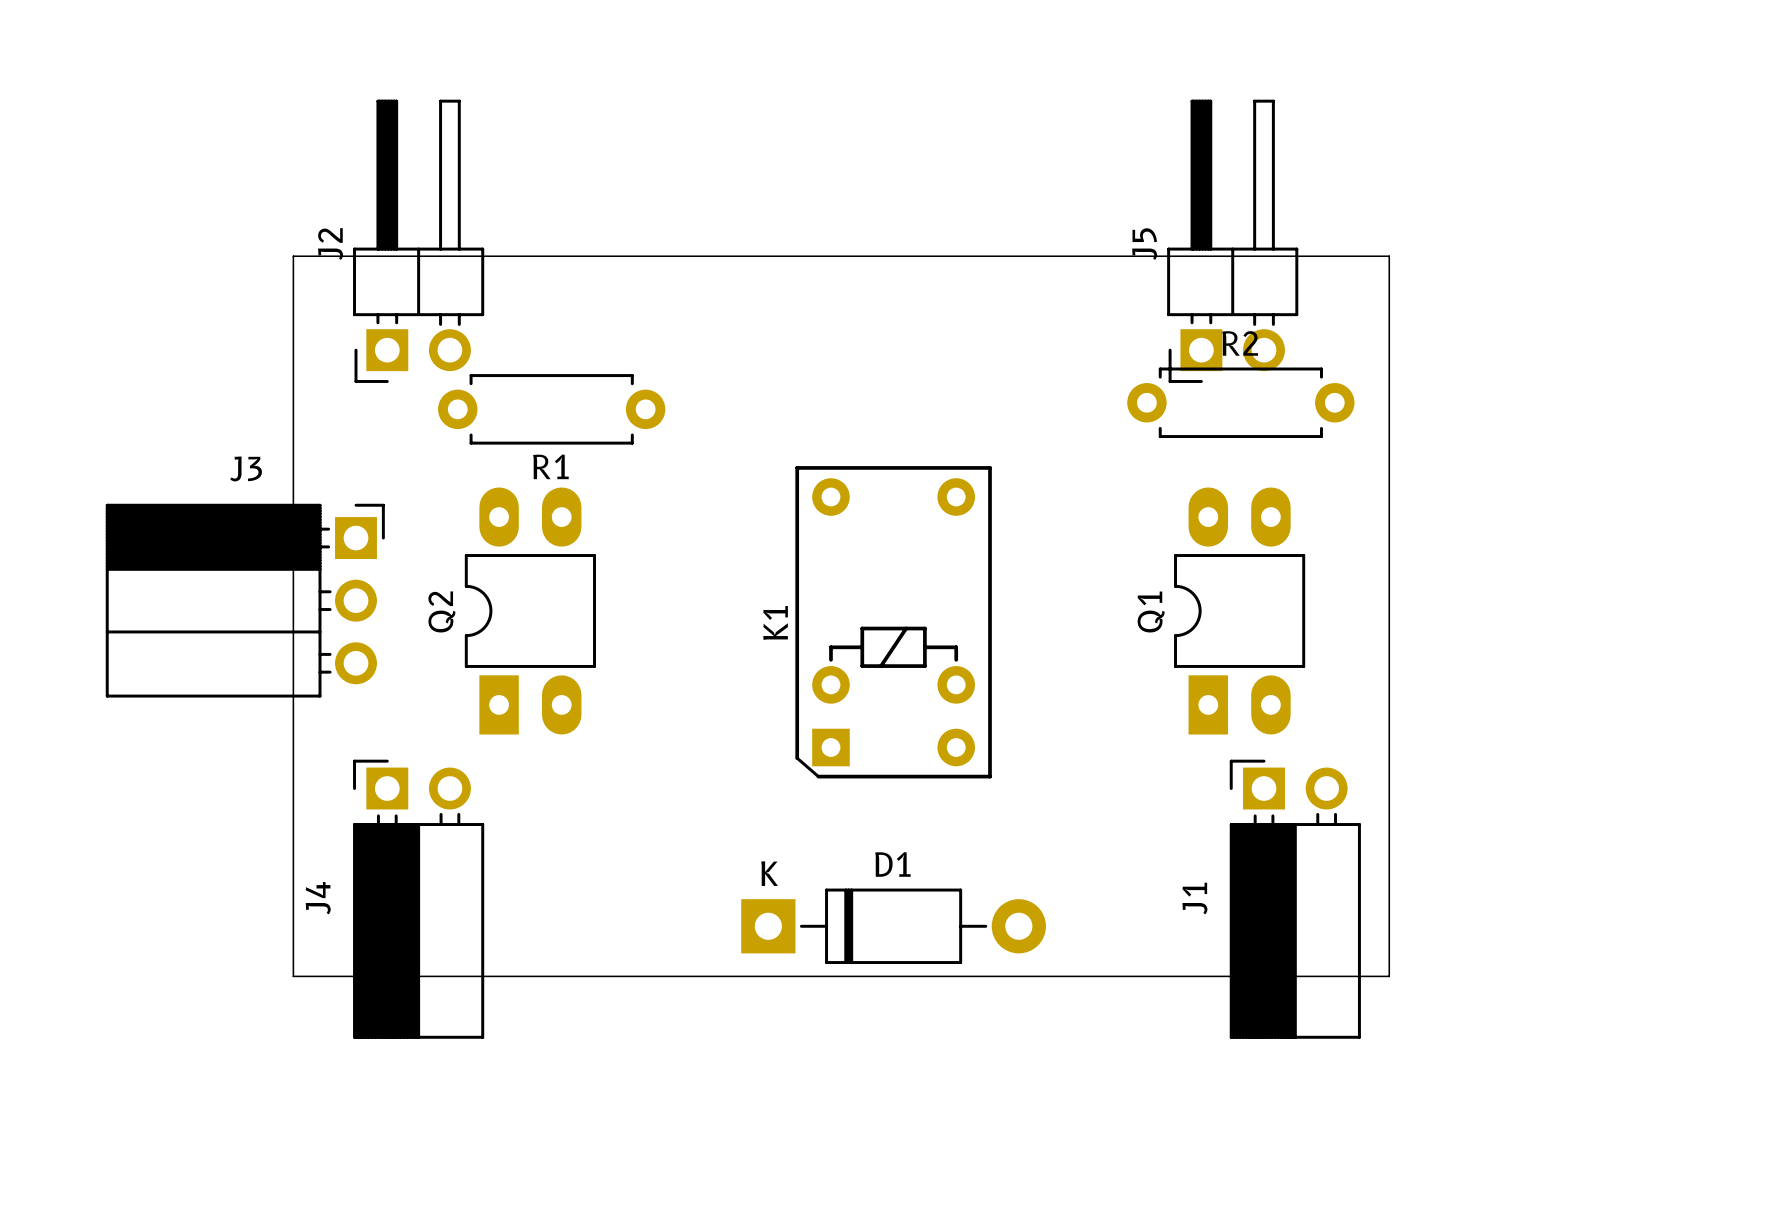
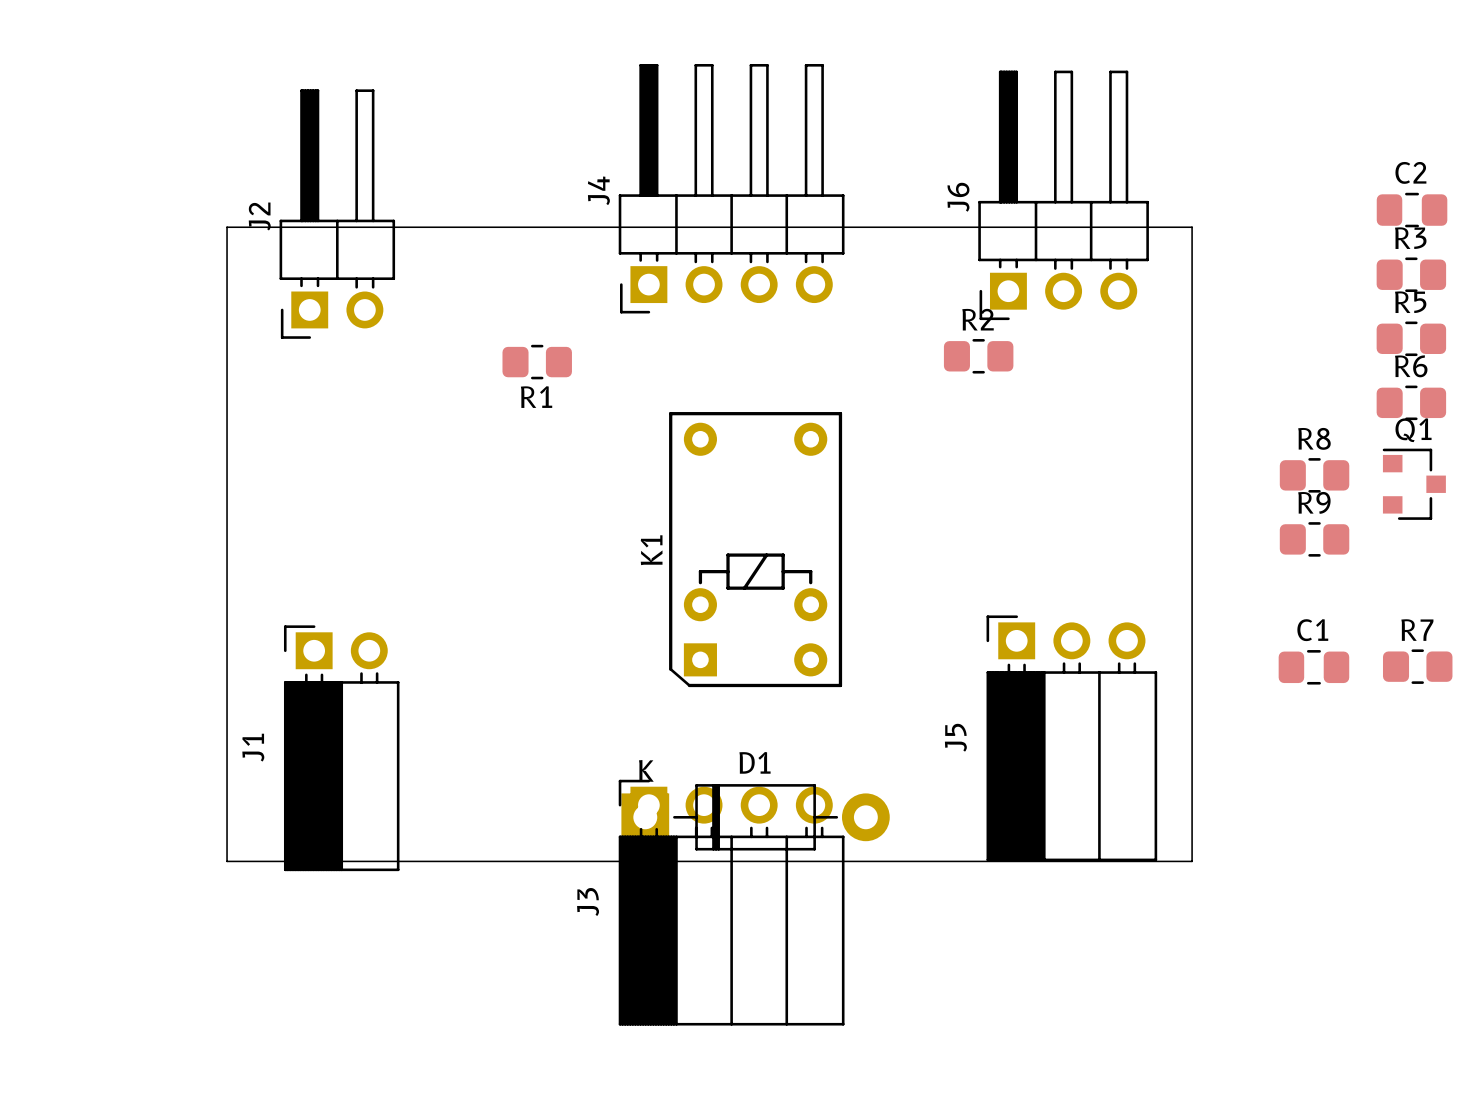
J5 footprint: [1167, 99, 1299, 383] -> [986, 615, 1158, 862]
J6: none -> (1063, 195)
C2: none -> (1412, 210)
R3: none -> (1411, 274)
R2 footprint: [1127, 367, 1355, 439] -> [943, 339, 1014, 374]
R1 footprint: [438, 374, 666, 445] -> [502, 344, 572, 380]
R5: none -> (1411, 338)
R6: none -> (1411, 402)
J3 name position: J3 (246, 468) -> J3 (588, 901)
Q1 footprint: [1174, 487, 1306, 735] -> [1382, 448, 1446, 520]
J3 footprint: [105, 503, 385, 698] -> [618, 779, 845, 1026]
R8: none -> (1314, 475)
Q2: (530, 610) -> none
R9: none -> (1314, 539)
Q1 name position: Q1 (1151, 612) -> Q1 (1413, 430)
C1: none -> (1313, 667)
R7: none -> (1417, 666)
J4 footprint: [353, 759, 485, 1039] -> [618, 64, 845, 314]
J4 name position: J4 (318, 898) -> J4 (598, 190)
J1 position: (1295, 899) -> (341, 748)

